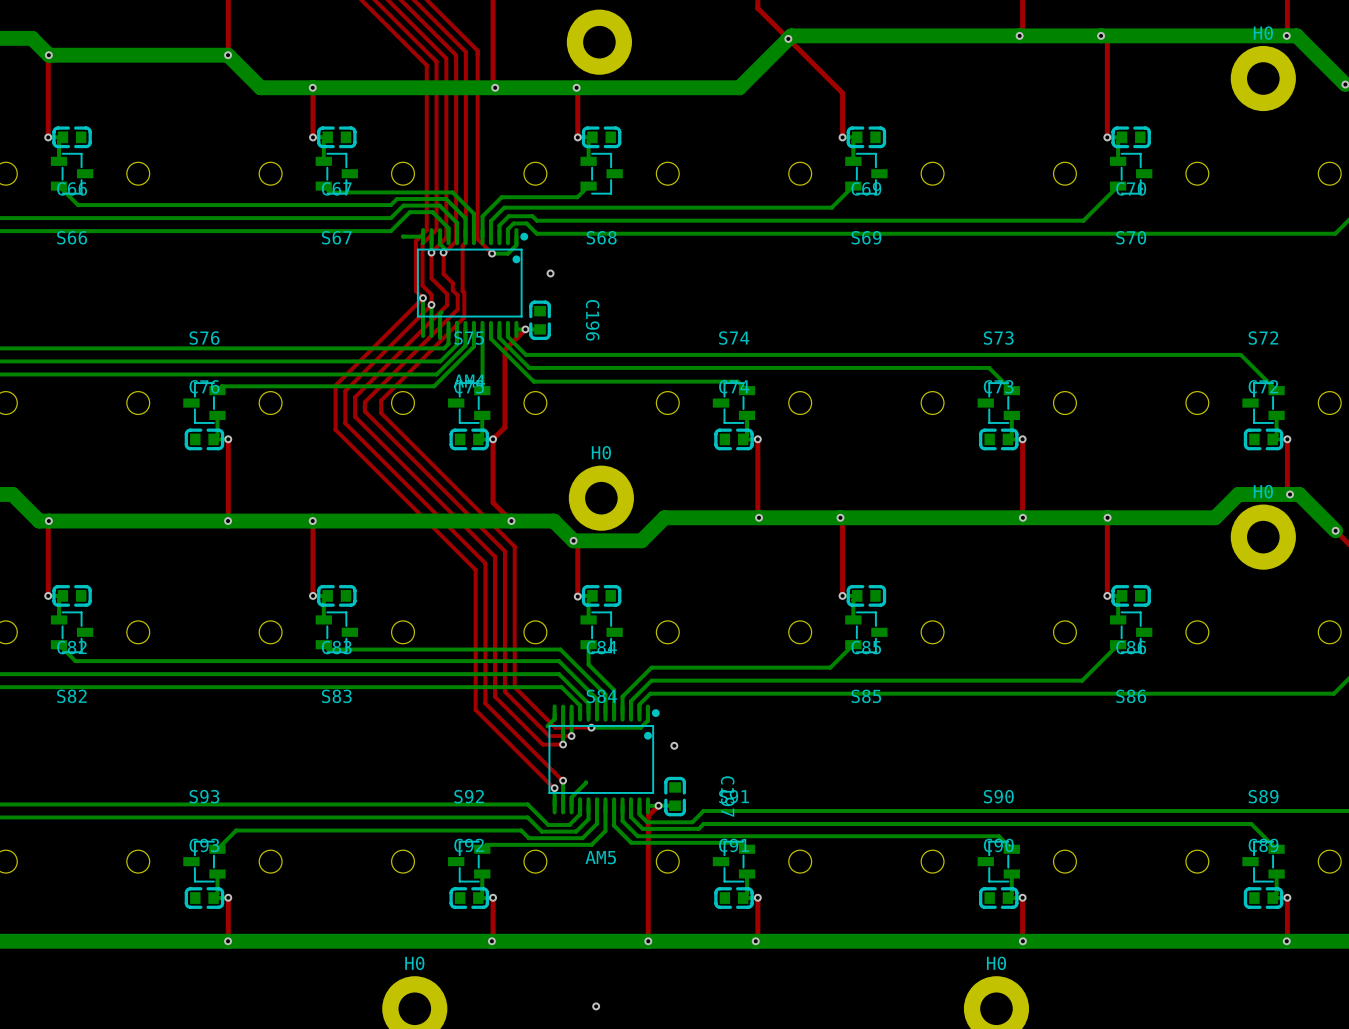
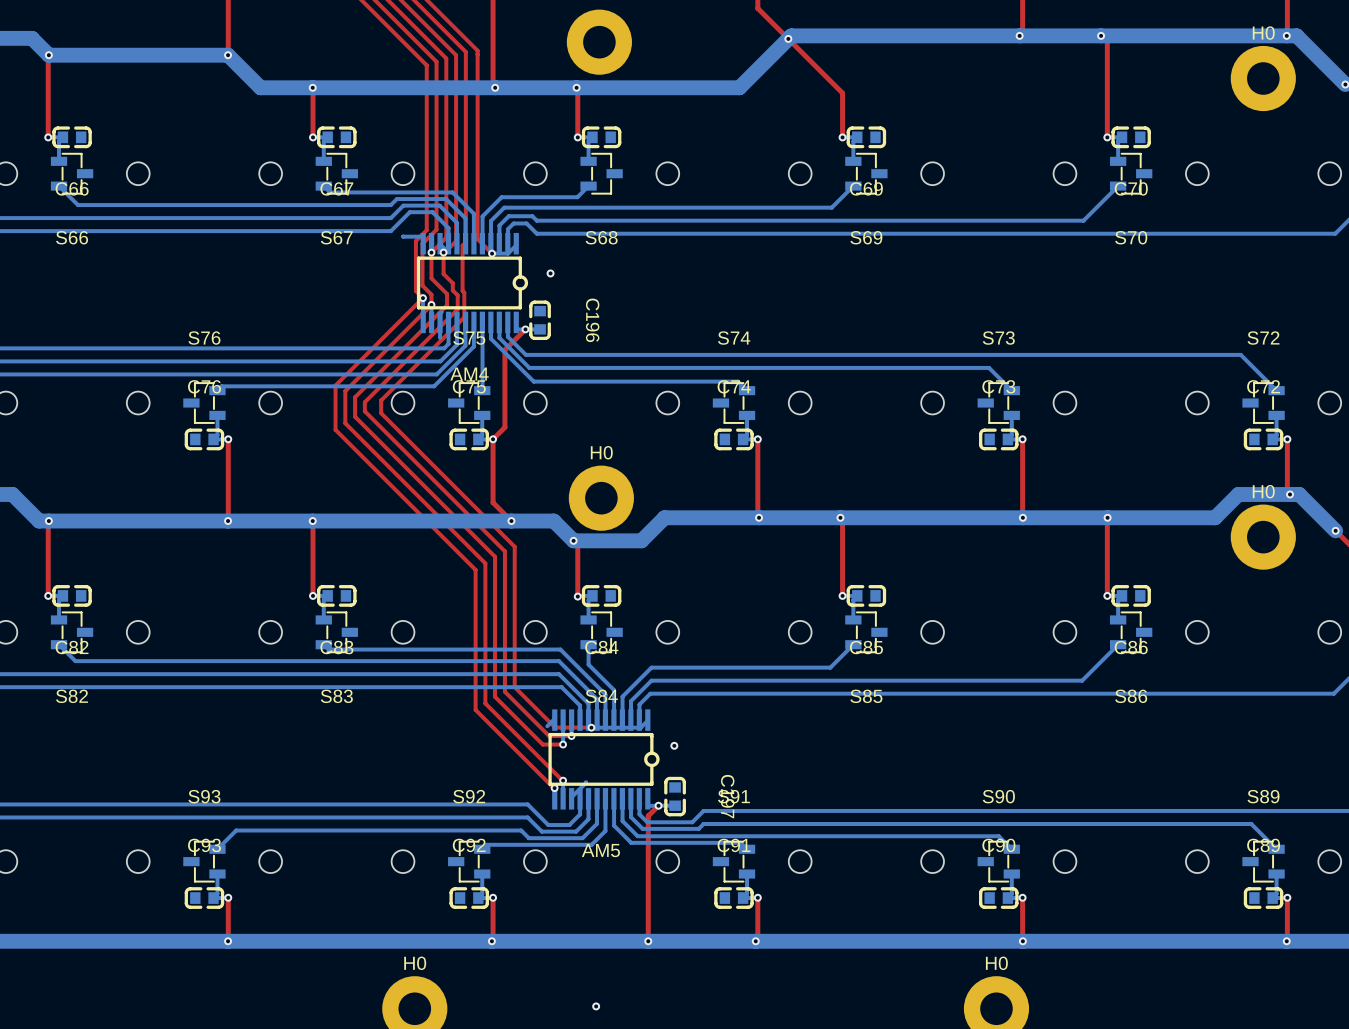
AM4 footprint: [416, 228, 529, 339] -> [416, 232, 529, 334]
AM5 footprint: [548, 704, 660, 815] -> [548, 709, 660, 810]

